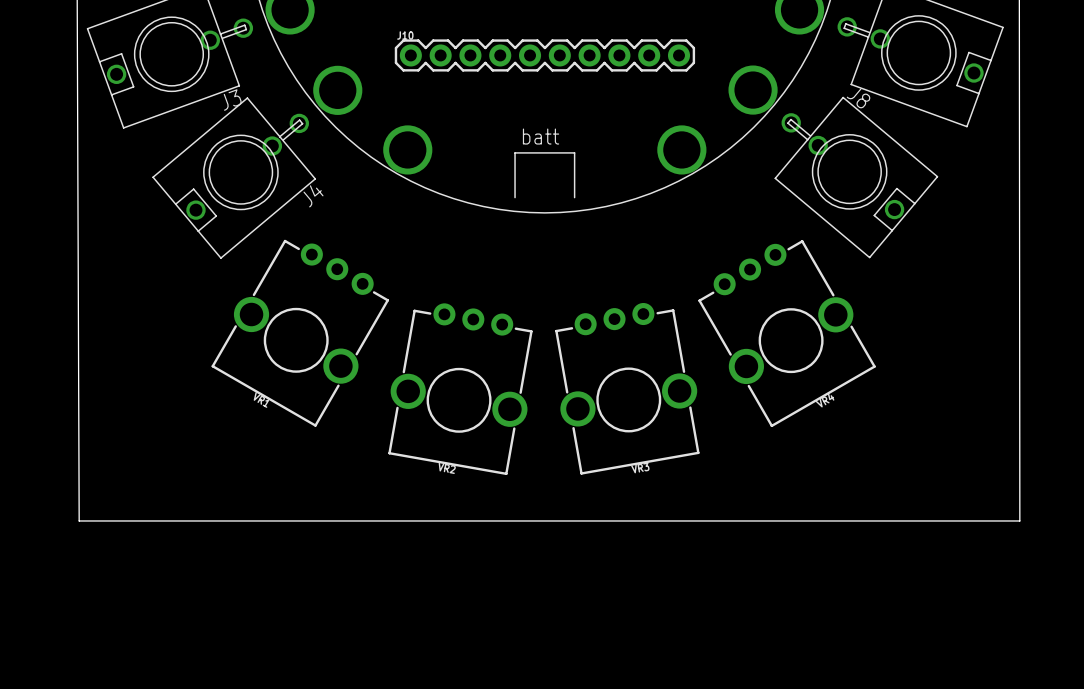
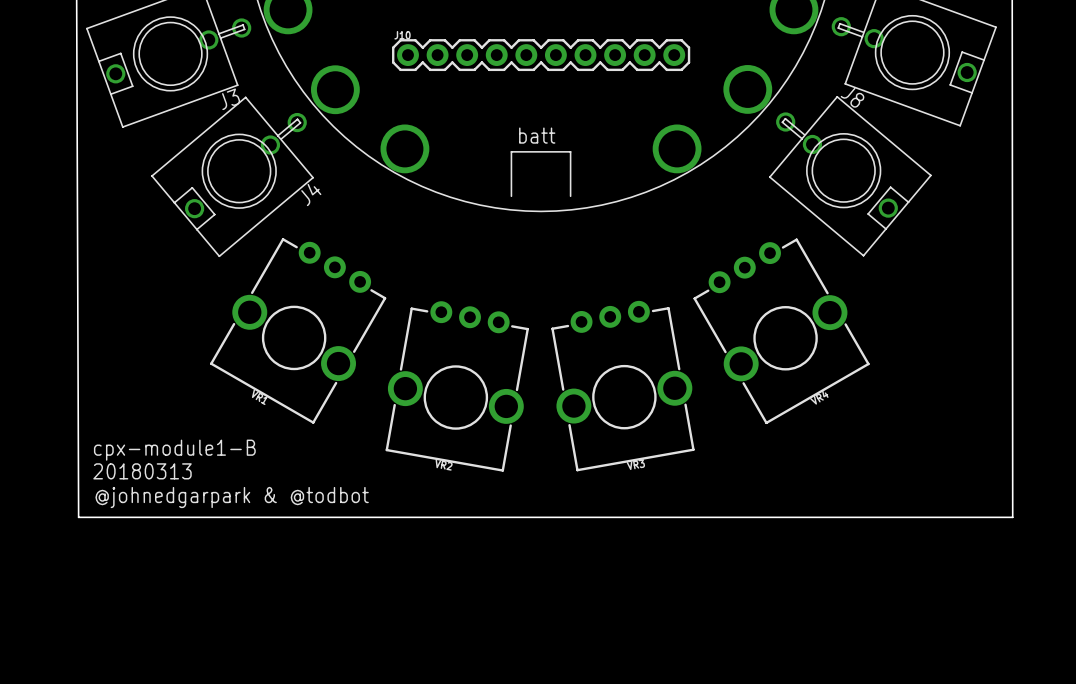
text: none -> cpx-module1-B (174, 450)
text: none -> 20180313 (142, 471)
text: none -> @johnedgarpark & @todbot (232, 497)

